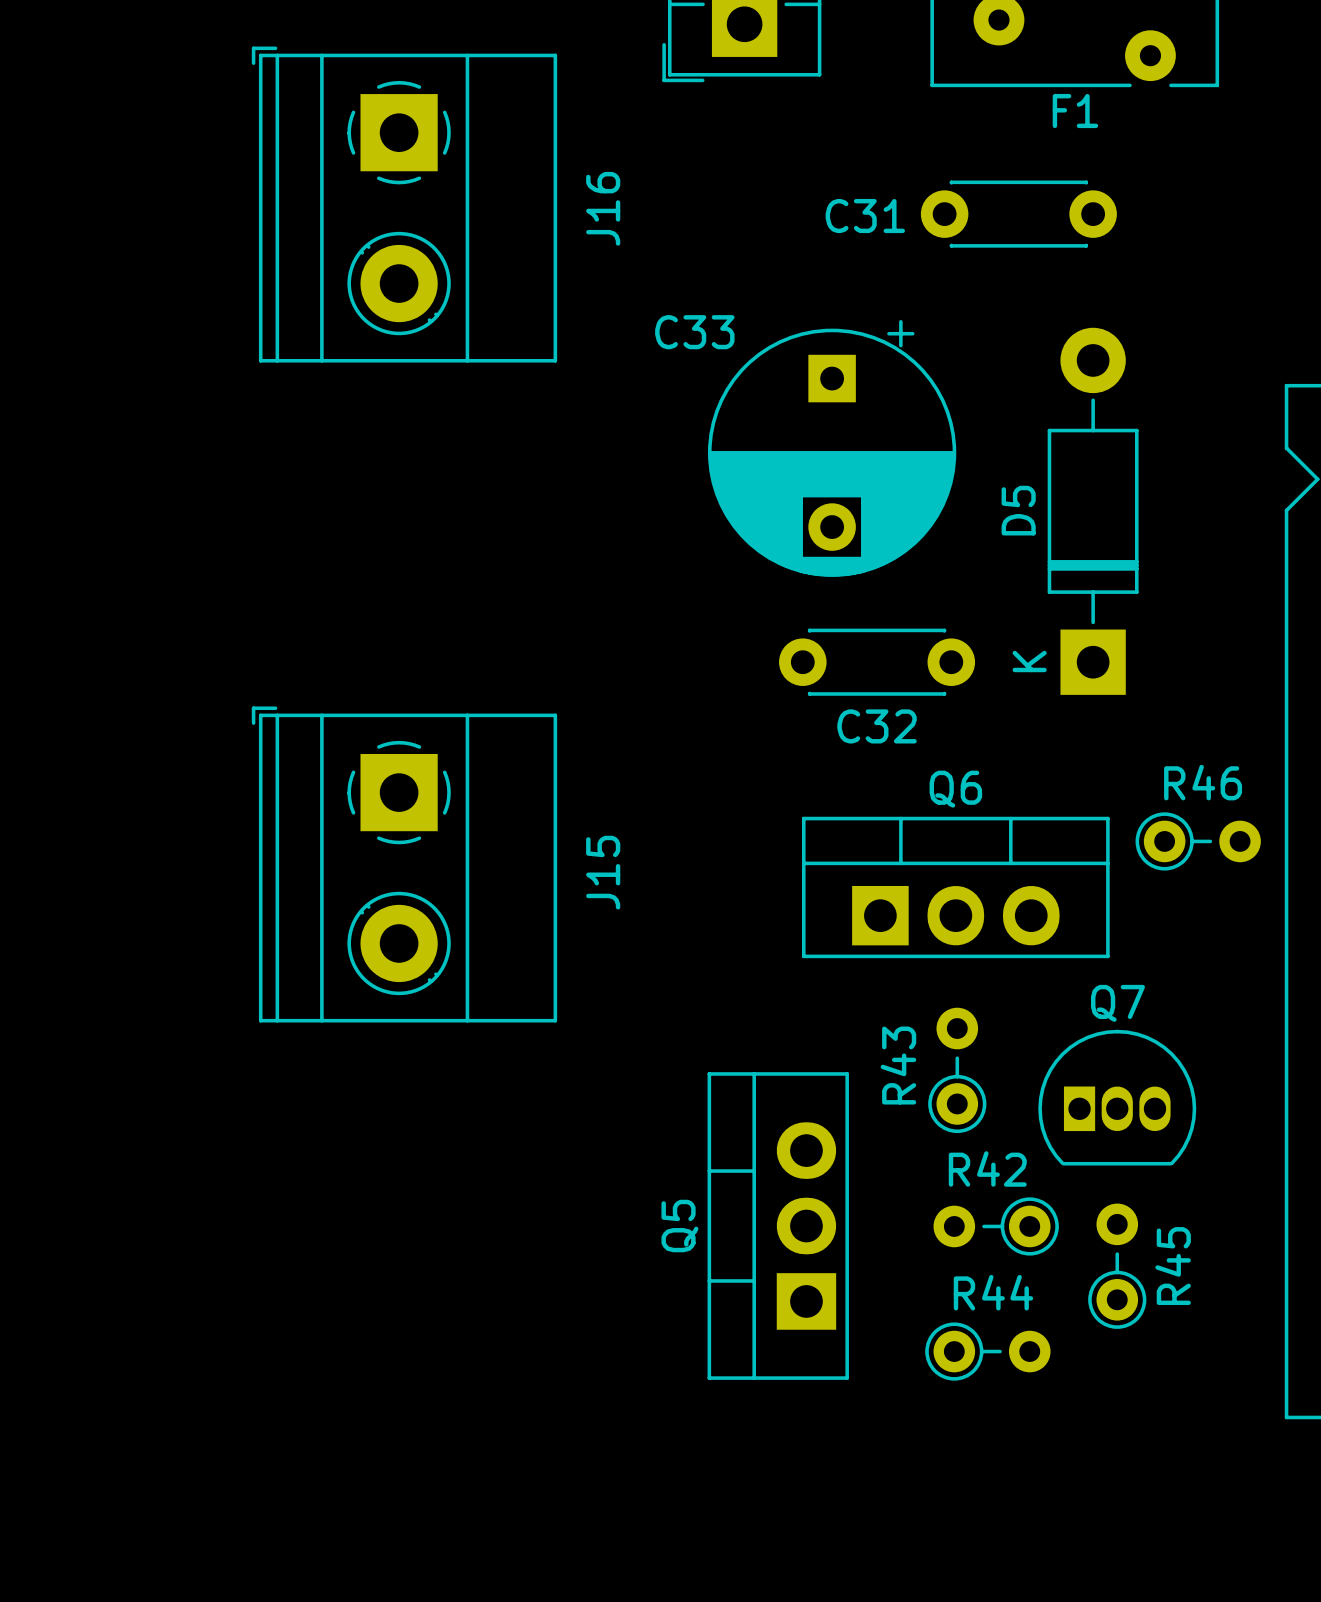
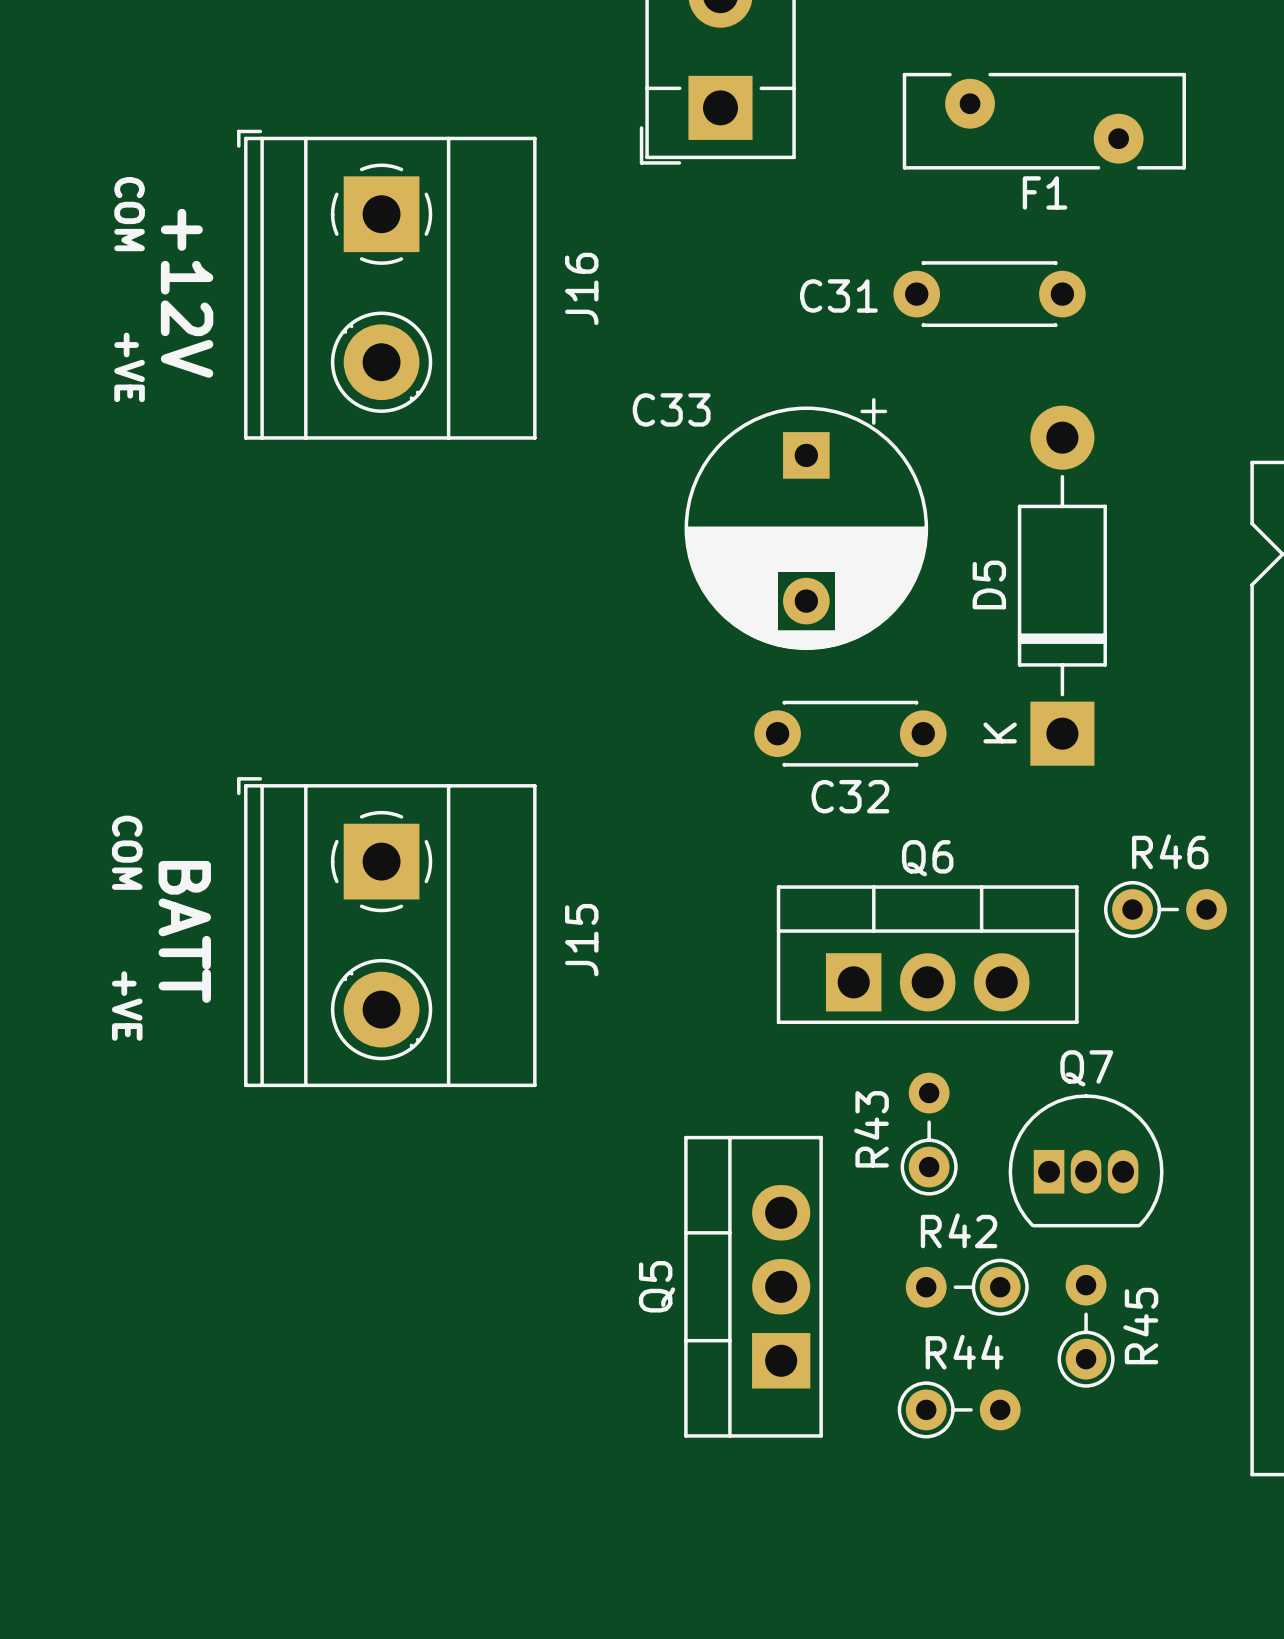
text: none -> COM +VE (129, 289)
text: none -> +12V (187, 293)
text: none -> COM +VE (127, 928)
text: none -> BATT (184, 931)

